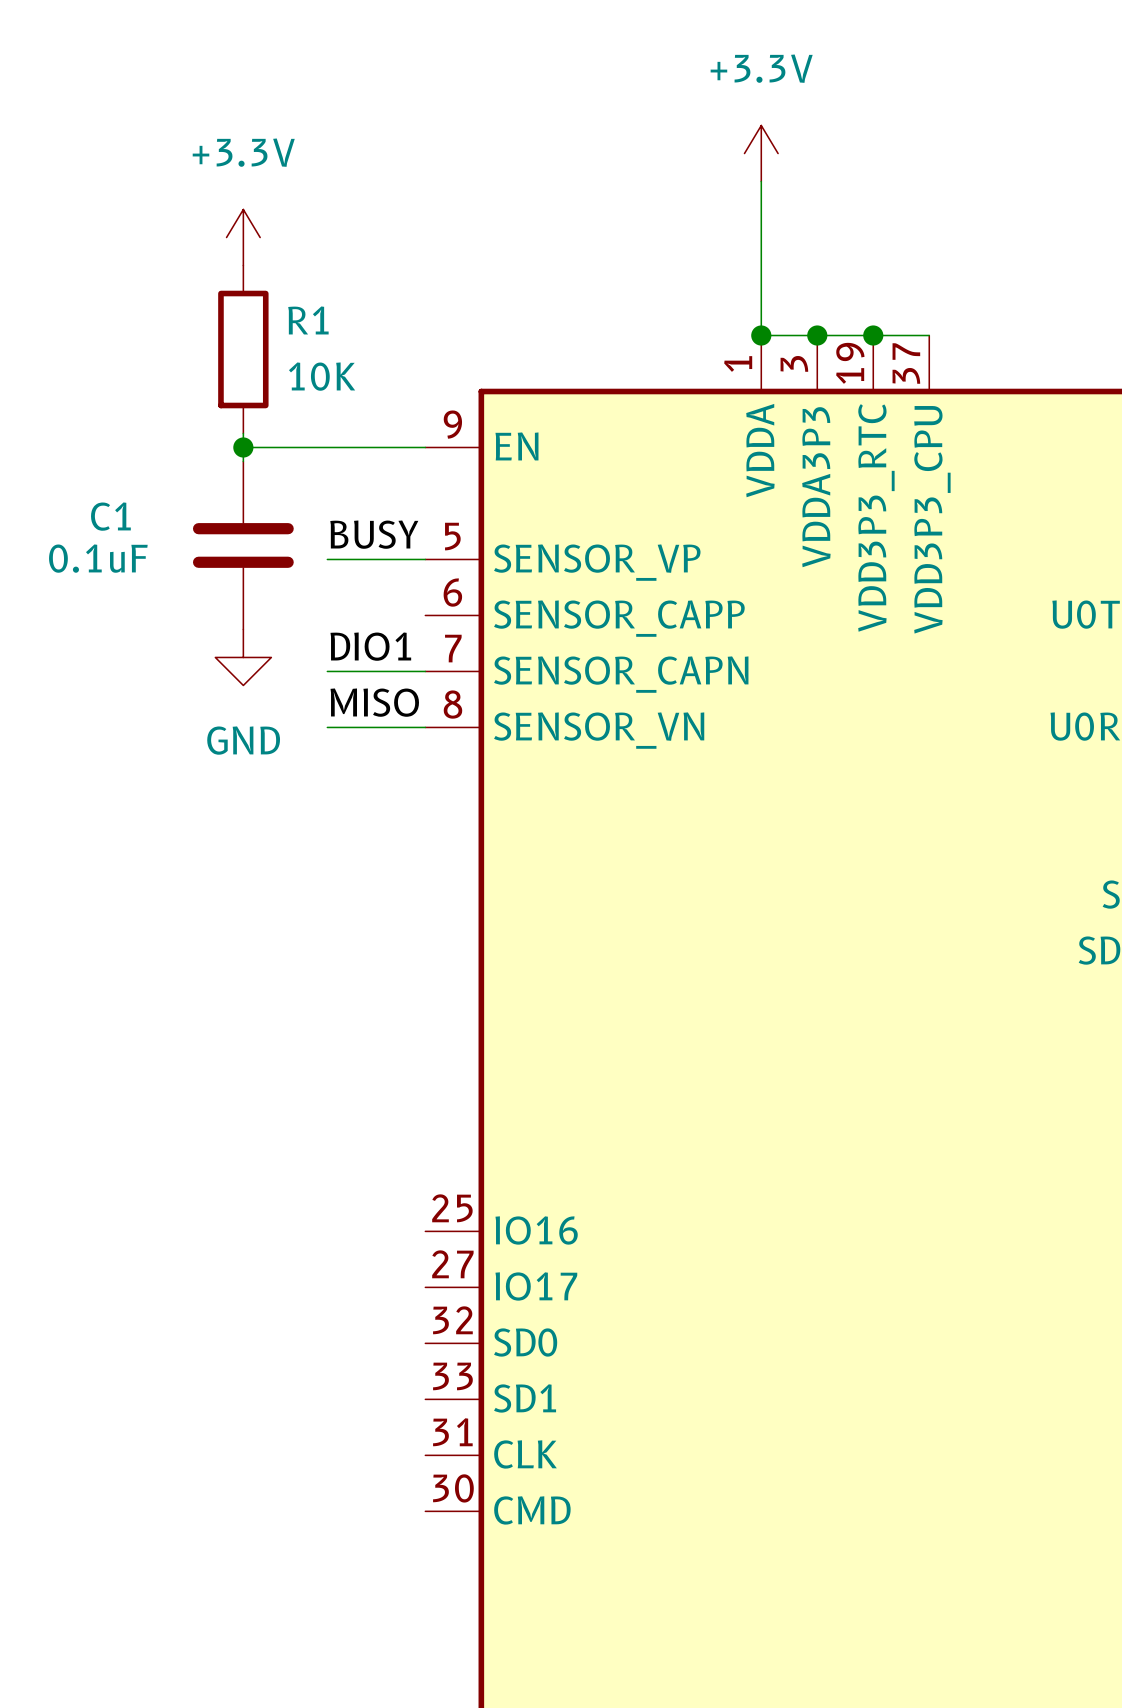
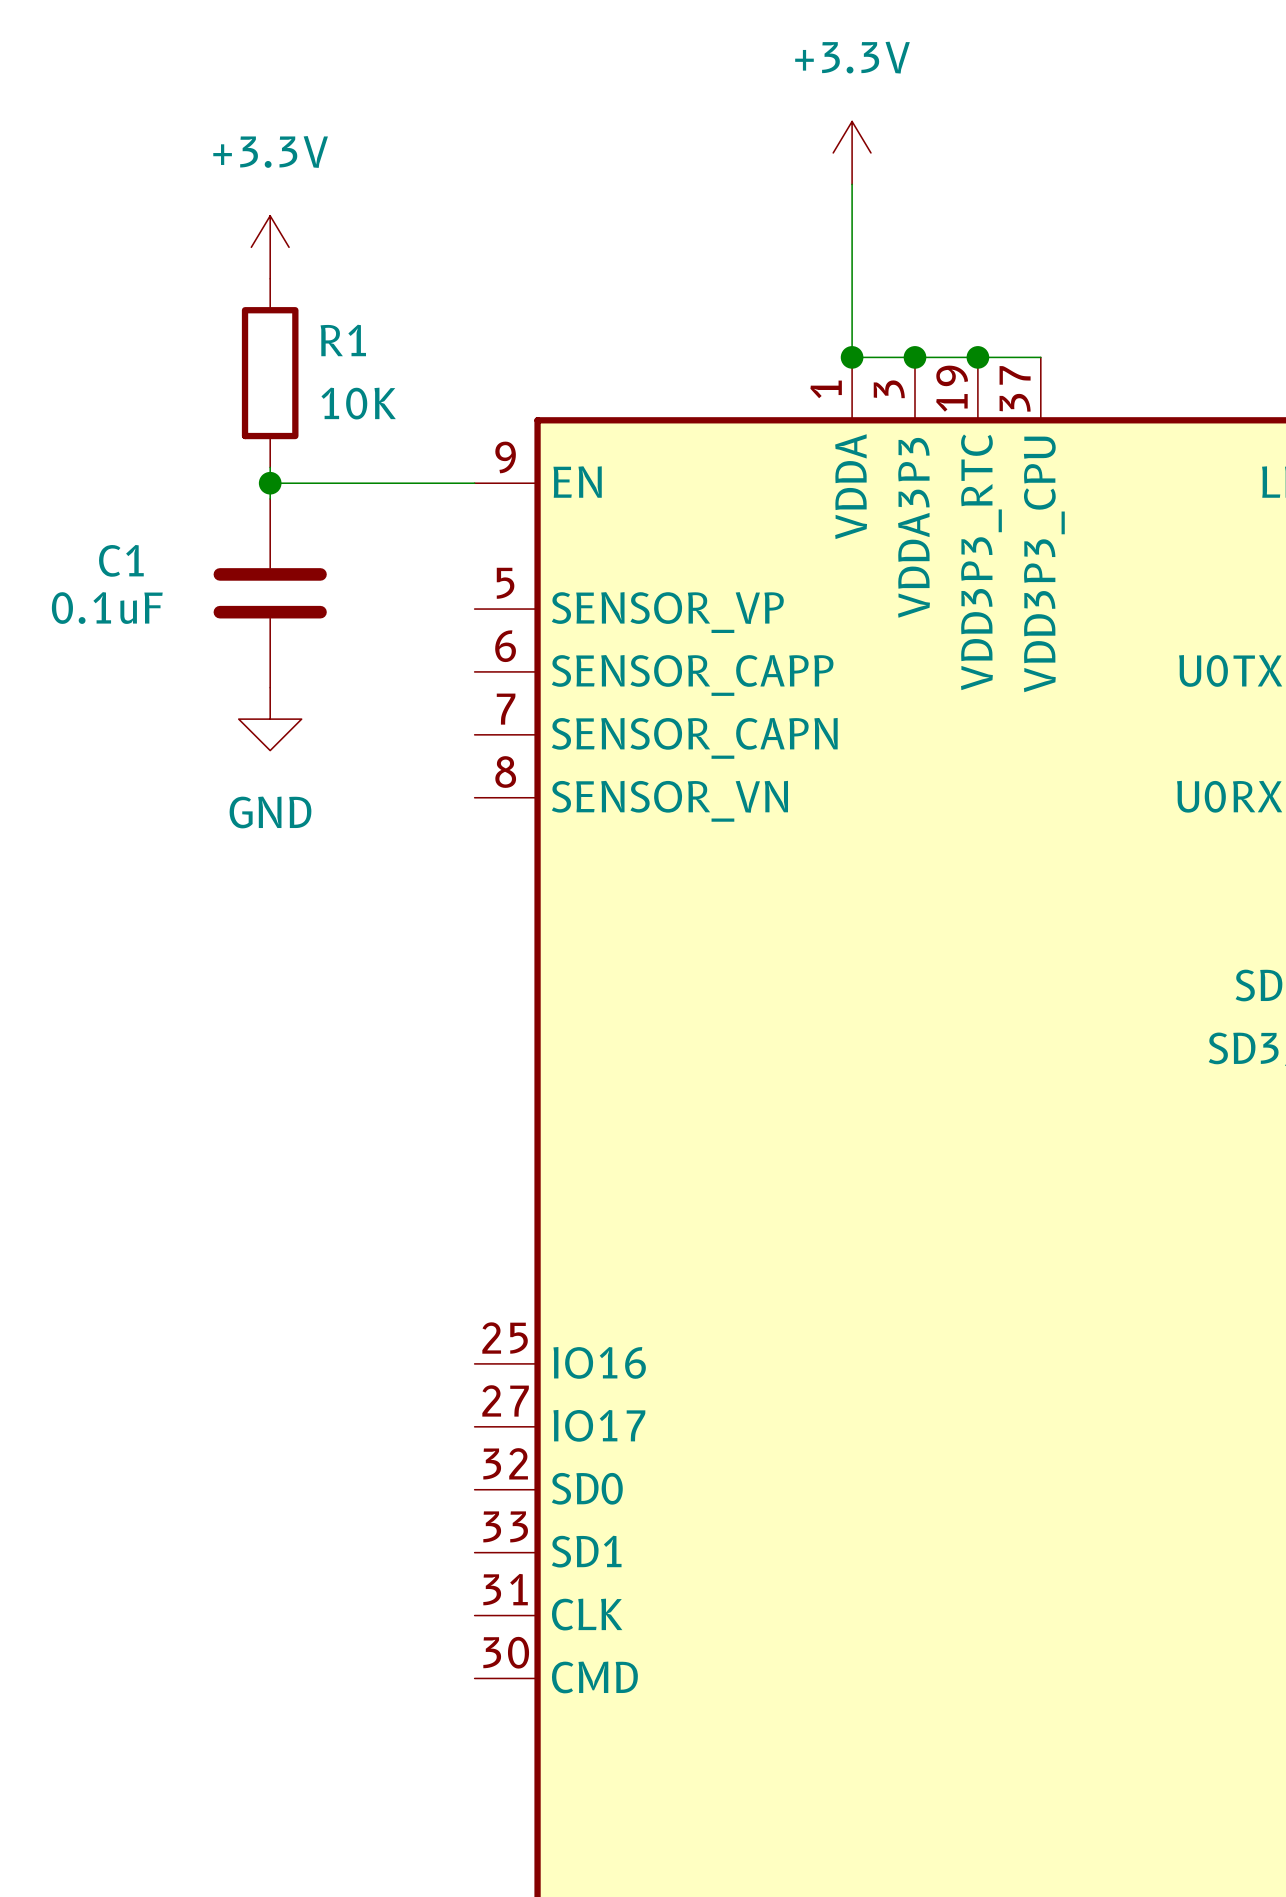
label: BUSY (374, 534) -> none
wire: (327, 559) (425, 559) -> none
label: DIO1 (370, 646) -> none
wire: (327, 671) (425, 671) -> none
label: MISO (374, 702) -> none
wire: (327, 727) (425, 727) -> none

